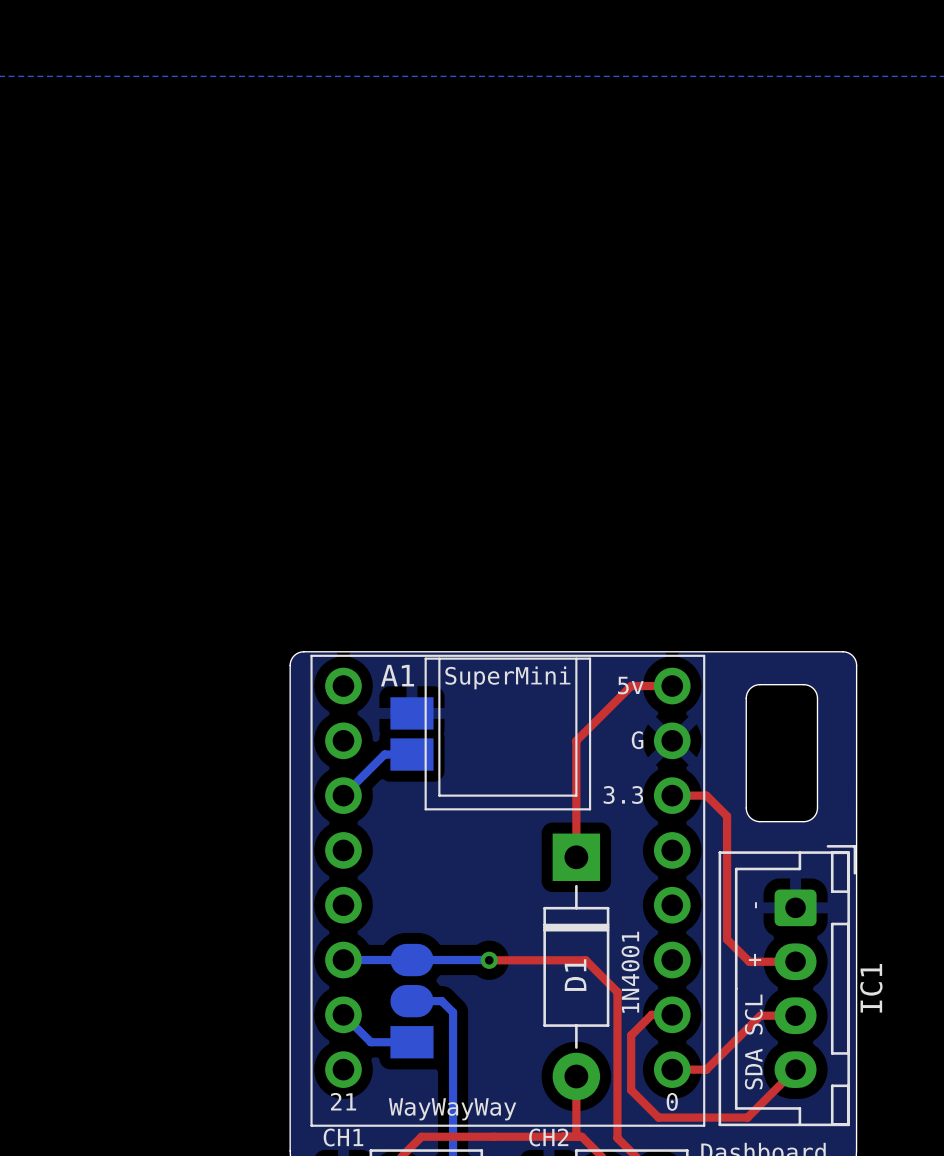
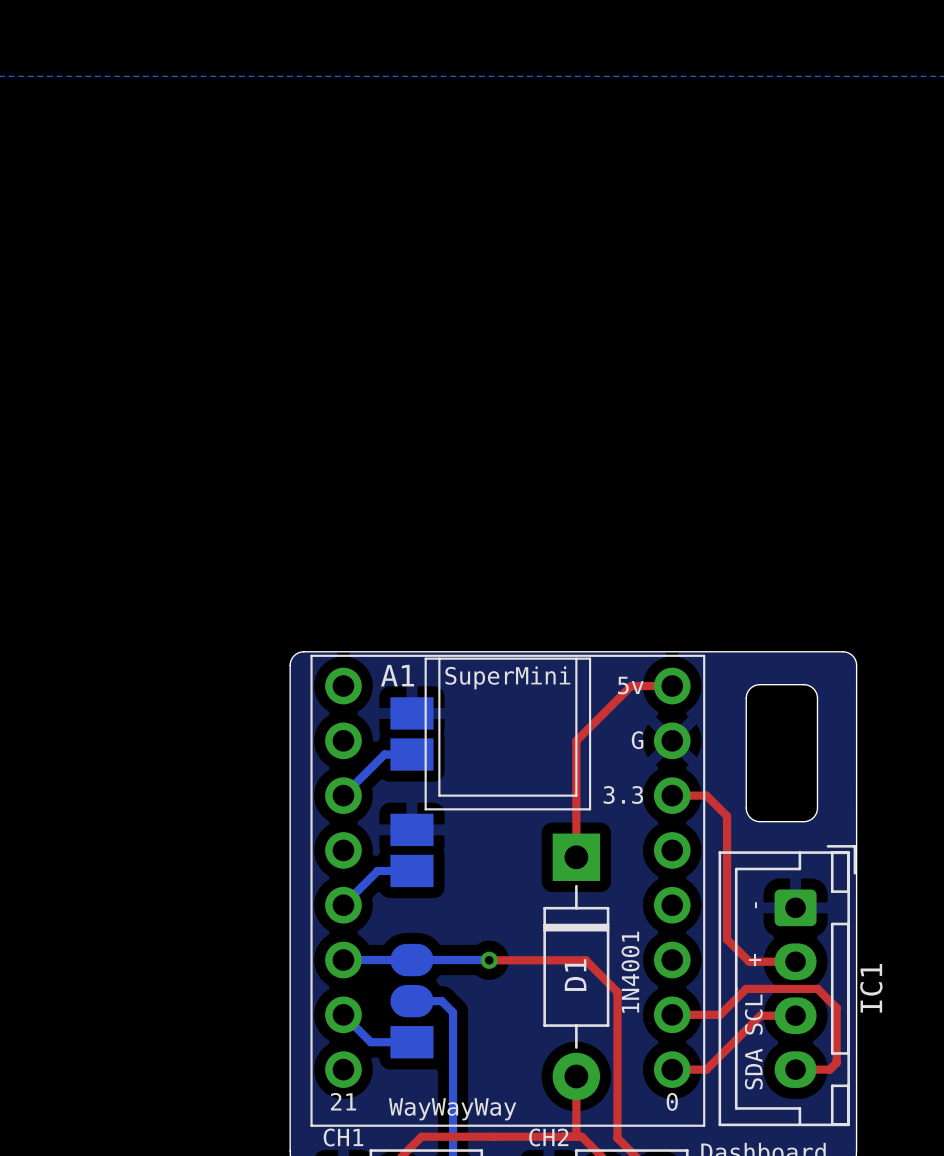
part: none -> (411, 850)
bottom track: none -> (411, 870) (377, 870) (343, 905)
top track: (672, 1014) (651, 1014) (631, 1035) (631, 1090) (658, 1117) (747, 1117) (795, 1069) -> (672, 1014) (720, 1014) (746, 988) (817, 988) (836, 1007) (836, 1062) (829, 1069) (795, 1069)

